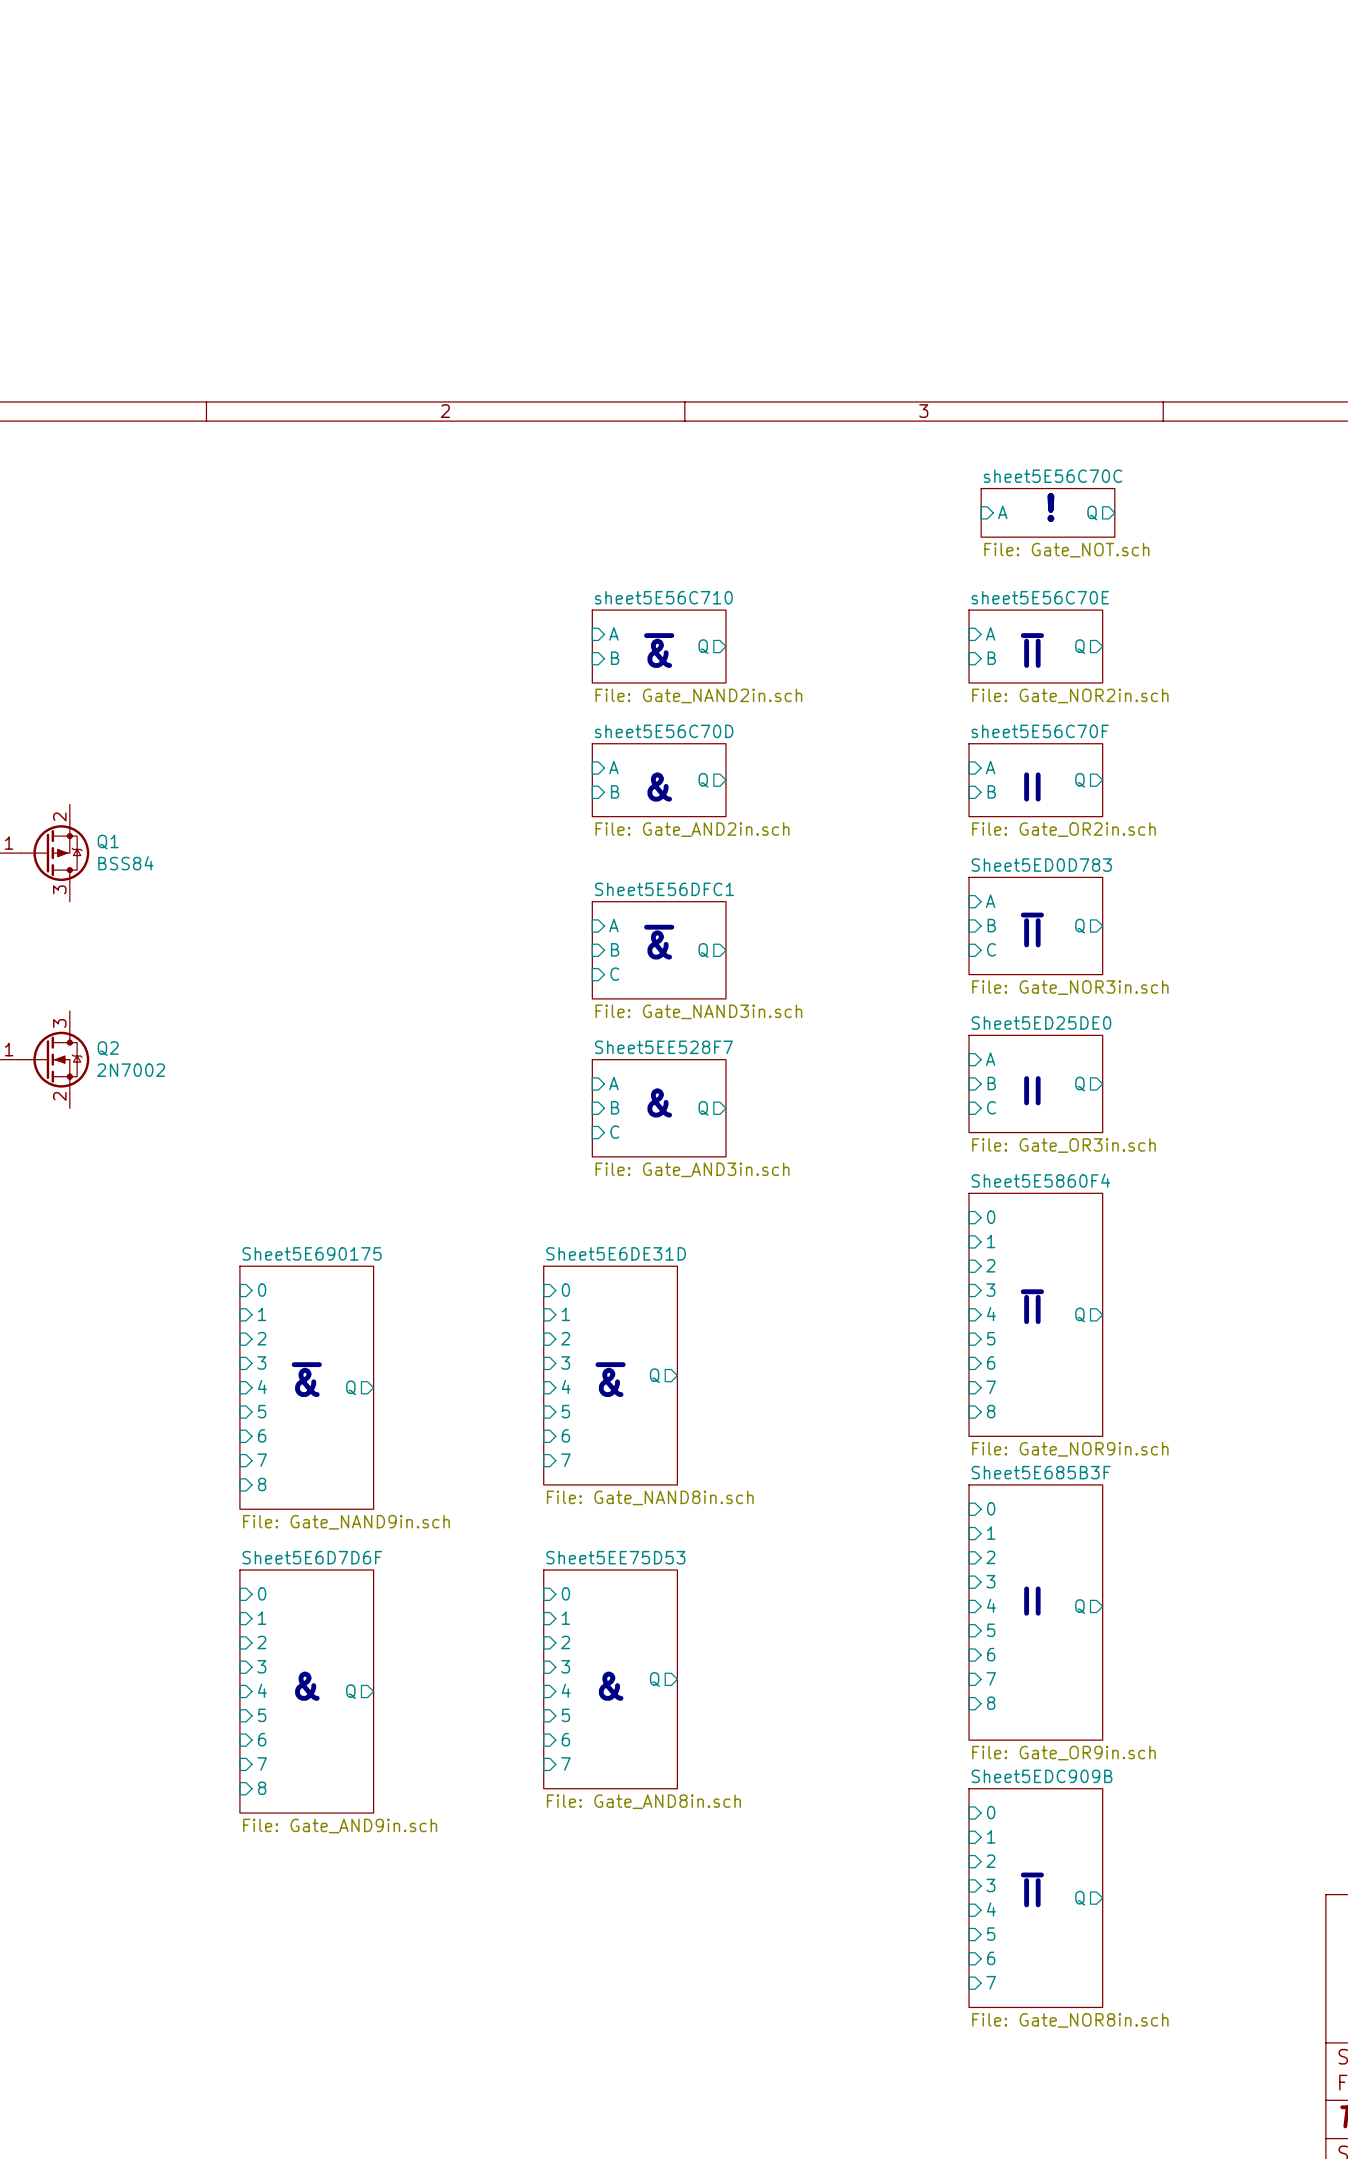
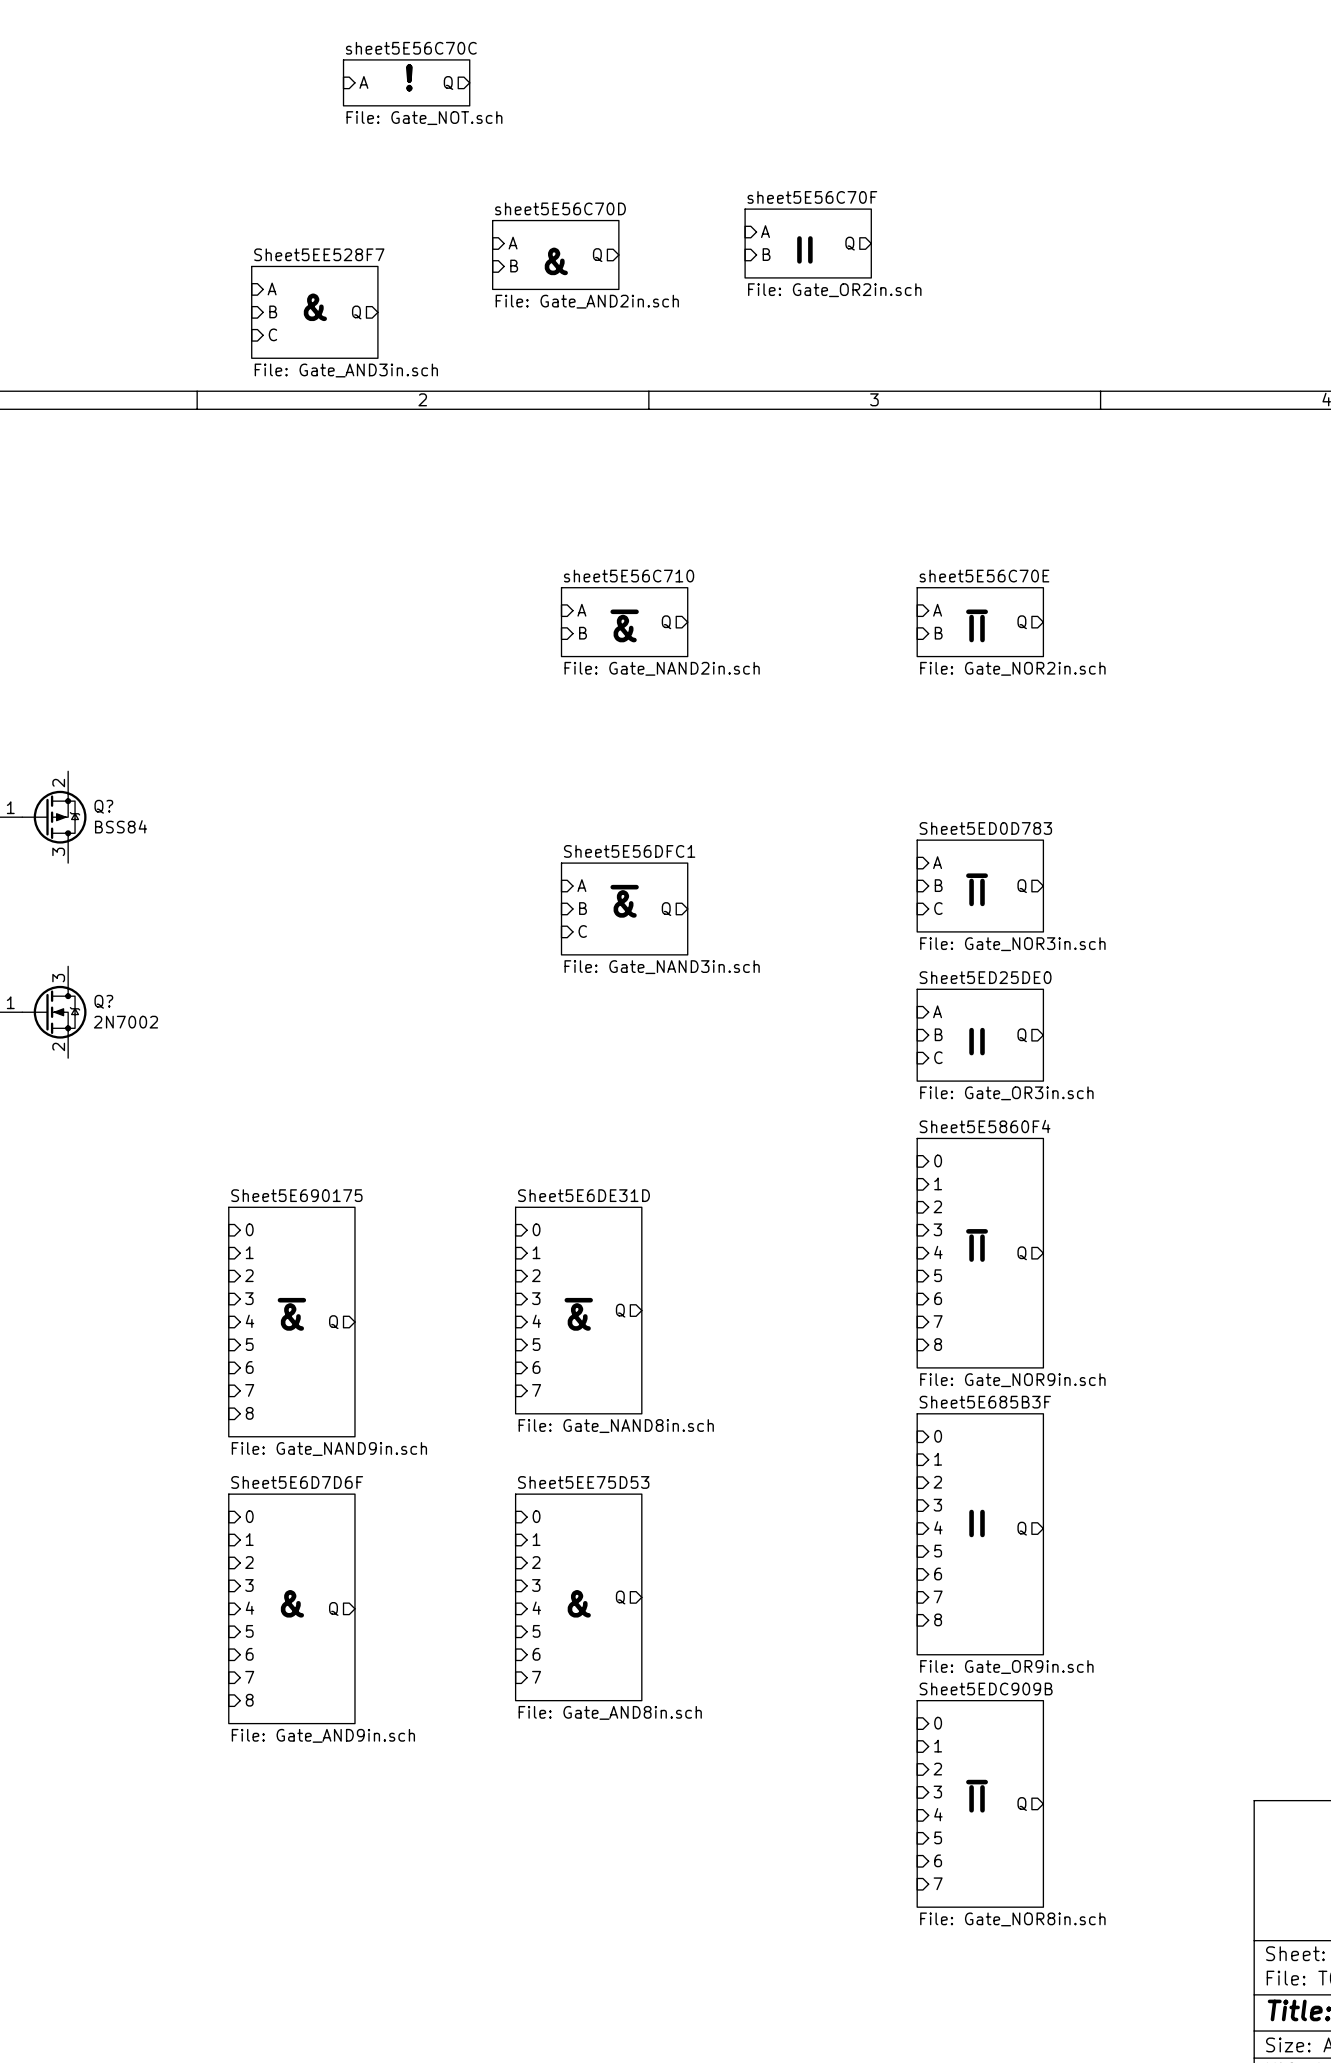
text: none -> ! (409, 77)
sheet pin: none -> A (363, 82)
sheet pin: none -> Q (448, 83)
sheet pin: none -> A (765, 231)
sheet pin: none -> A (513, 243)
sheet pin: none -> Q (850, 243)
text: none -> II (804, 249)
sheet pin: none -> Q (597, 255)
sheet pin: none -> B (766, 254)
text: none -> & (556, 261)
sheet pin: none -> B (514, 266)
sheet pin: none -> A (272, 288)
text: none -> & (315, 307)
sheet pin: none -> B (273, 311)
sheet pin: none -> Q (356, 312)
sheet pin: none -> C (272, 334)
text: ! (1050, 507) -> none
sheet pin: A (1002, 512) -> none
sheet sheet5E56C70C position: (1047, 512) -> (406, 82)
sheet pin: Q (1092, 512) -> none
sheet pin: A (613, 767) -> none
sheet pin: A (990, 767) -> none
sheet sheet5E56C70D position: (659, 780) -> (555, 254)
sheet pin: Q (703, 780) -> none
sheet sheet5E56C70F position: (1035, 780) -> (808, 243)
sheet pin: Q (1080, 780) -> none
text: & (659, 786) -> none
text: II (1032, 786) -> none
sheet pin: B (615, 791) -> none
sheet pin: B (991, 791) -> none
Q1 name: Q1 (108, 842) -> Q? (103, 806)
Q2 name: Q2 (108, 1048) -> Q? (103, 1001)
sheet pin: A (613, 1083) -> none
text: & (659, 1102) -> none
sheet pin: B (615, 1107) -> none
sheet Sheet5EE528F7 position: (659, 1108) -> (314, 312)
sheet pin: Q (703, 1108) -> none
sheet pin: C (614, 1132) -> none

